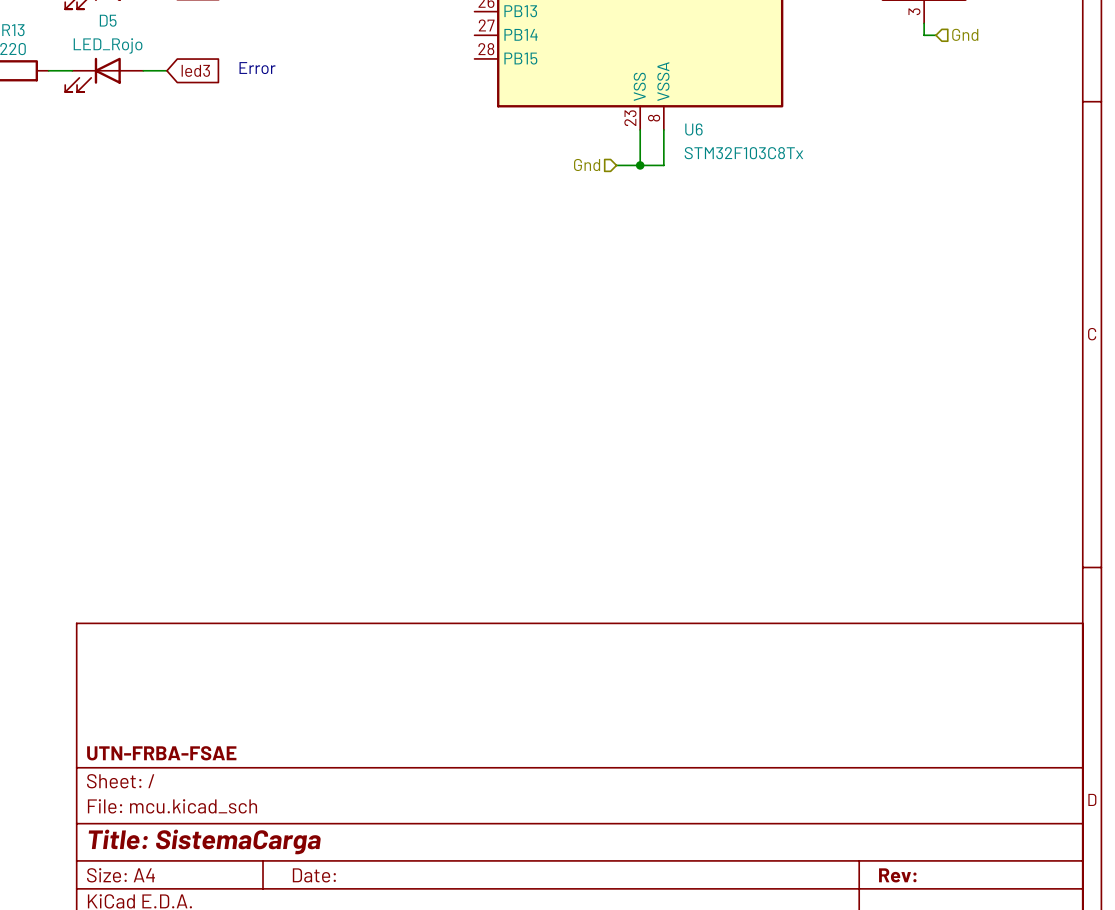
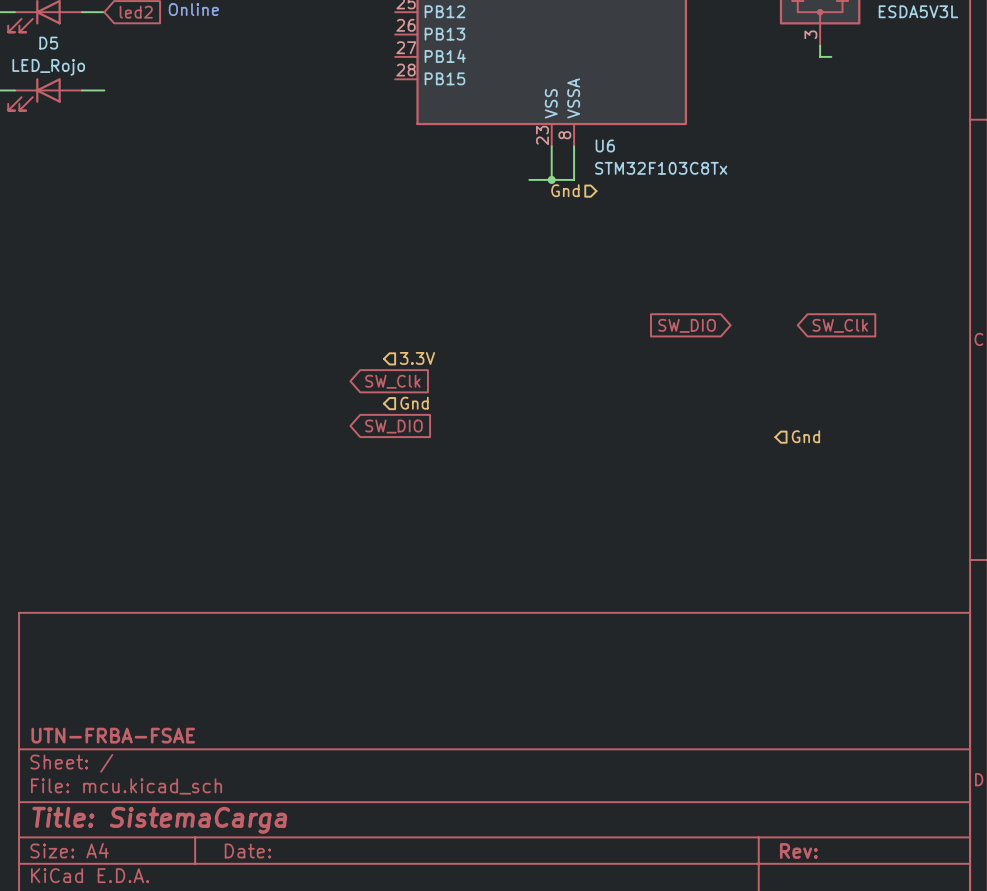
hierarchical label: Gnd (965, 34) -> none
text: Error (257, 68) -> none
global label: led3 (195, 70) -> none
hierarchical label position: Gnd (587, 164) -> Gnd (565, 190)
global label: none -> SW_DIO (687, 325)
global label: none -> SW_Clk (840, 325)
hierarchical label: none -> 3.3V (417, 358)
global label: none -> SW_Clk (392, 381)
hierarchical label: none -> Gnd (414, 403)
global label: none -> SW_DIO (393, 426)
hierarchical label: none -> Gnd (805, 436)

